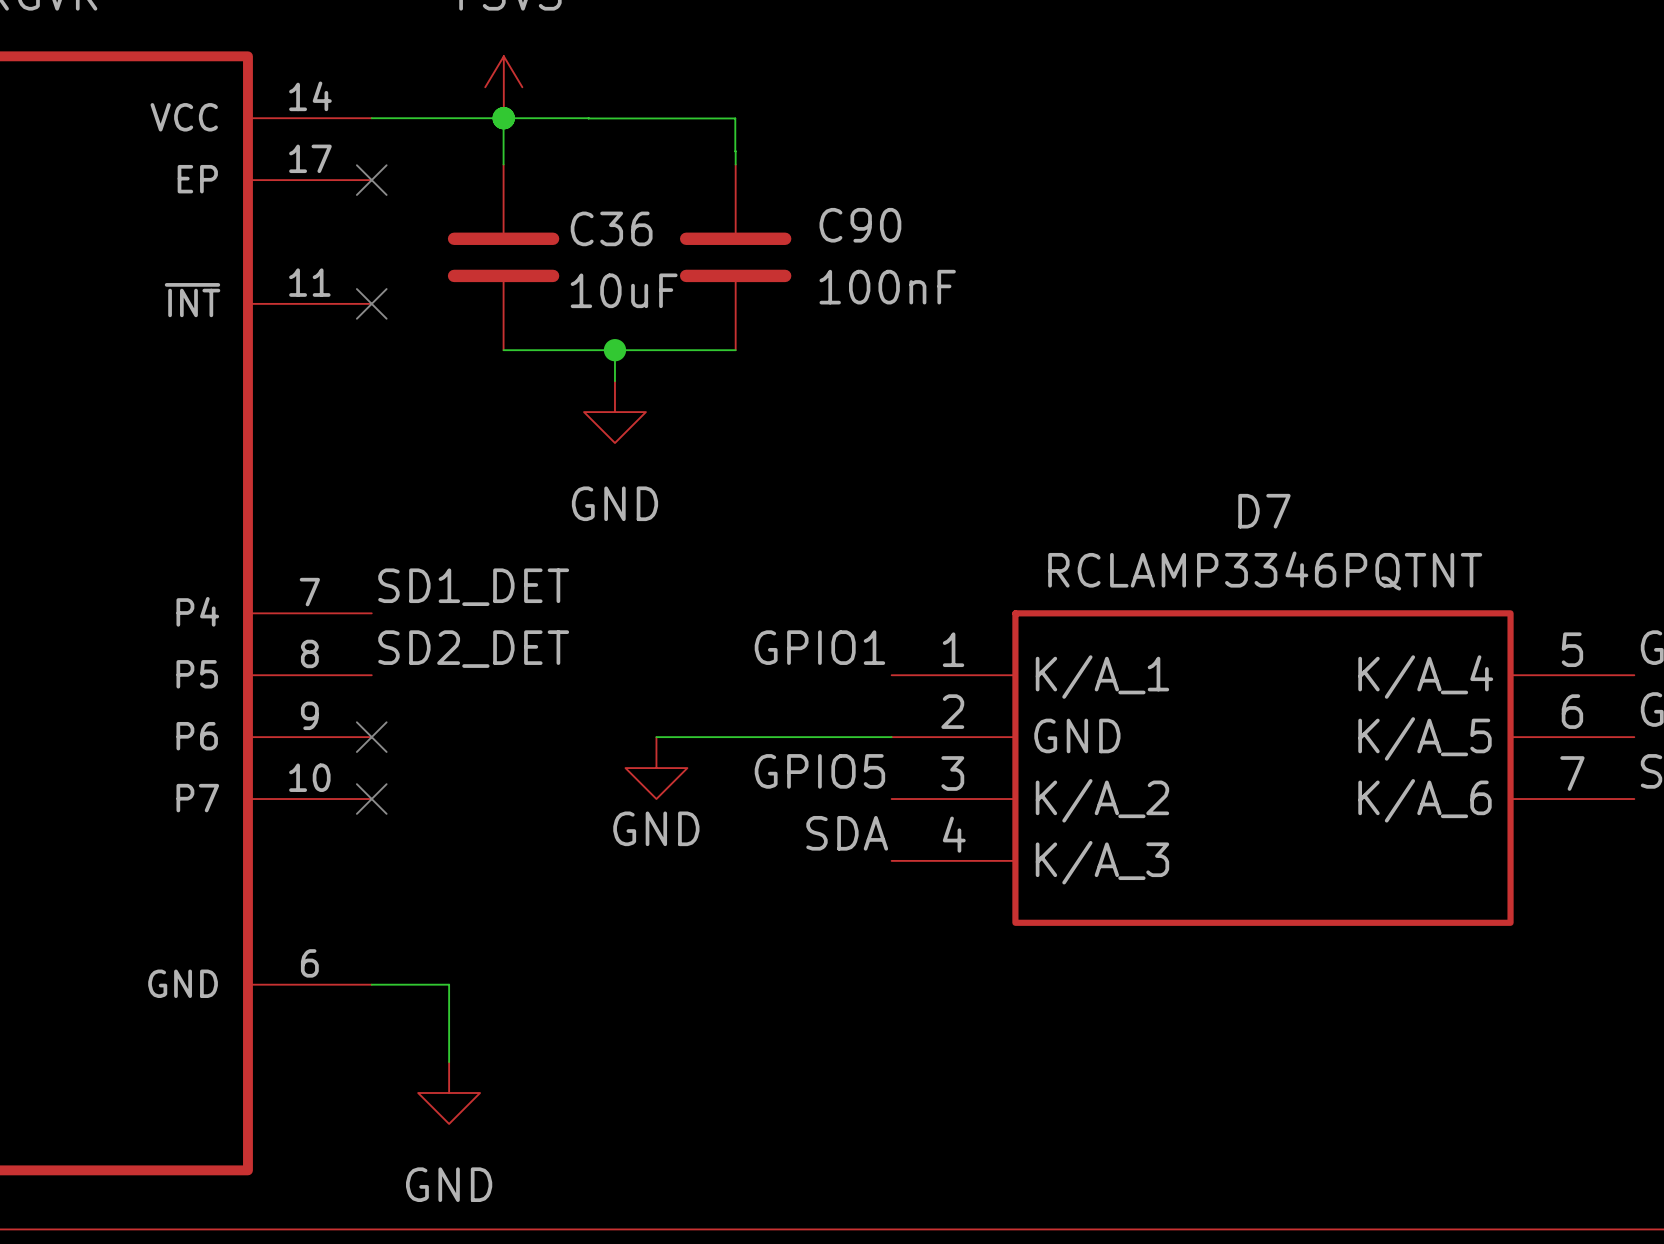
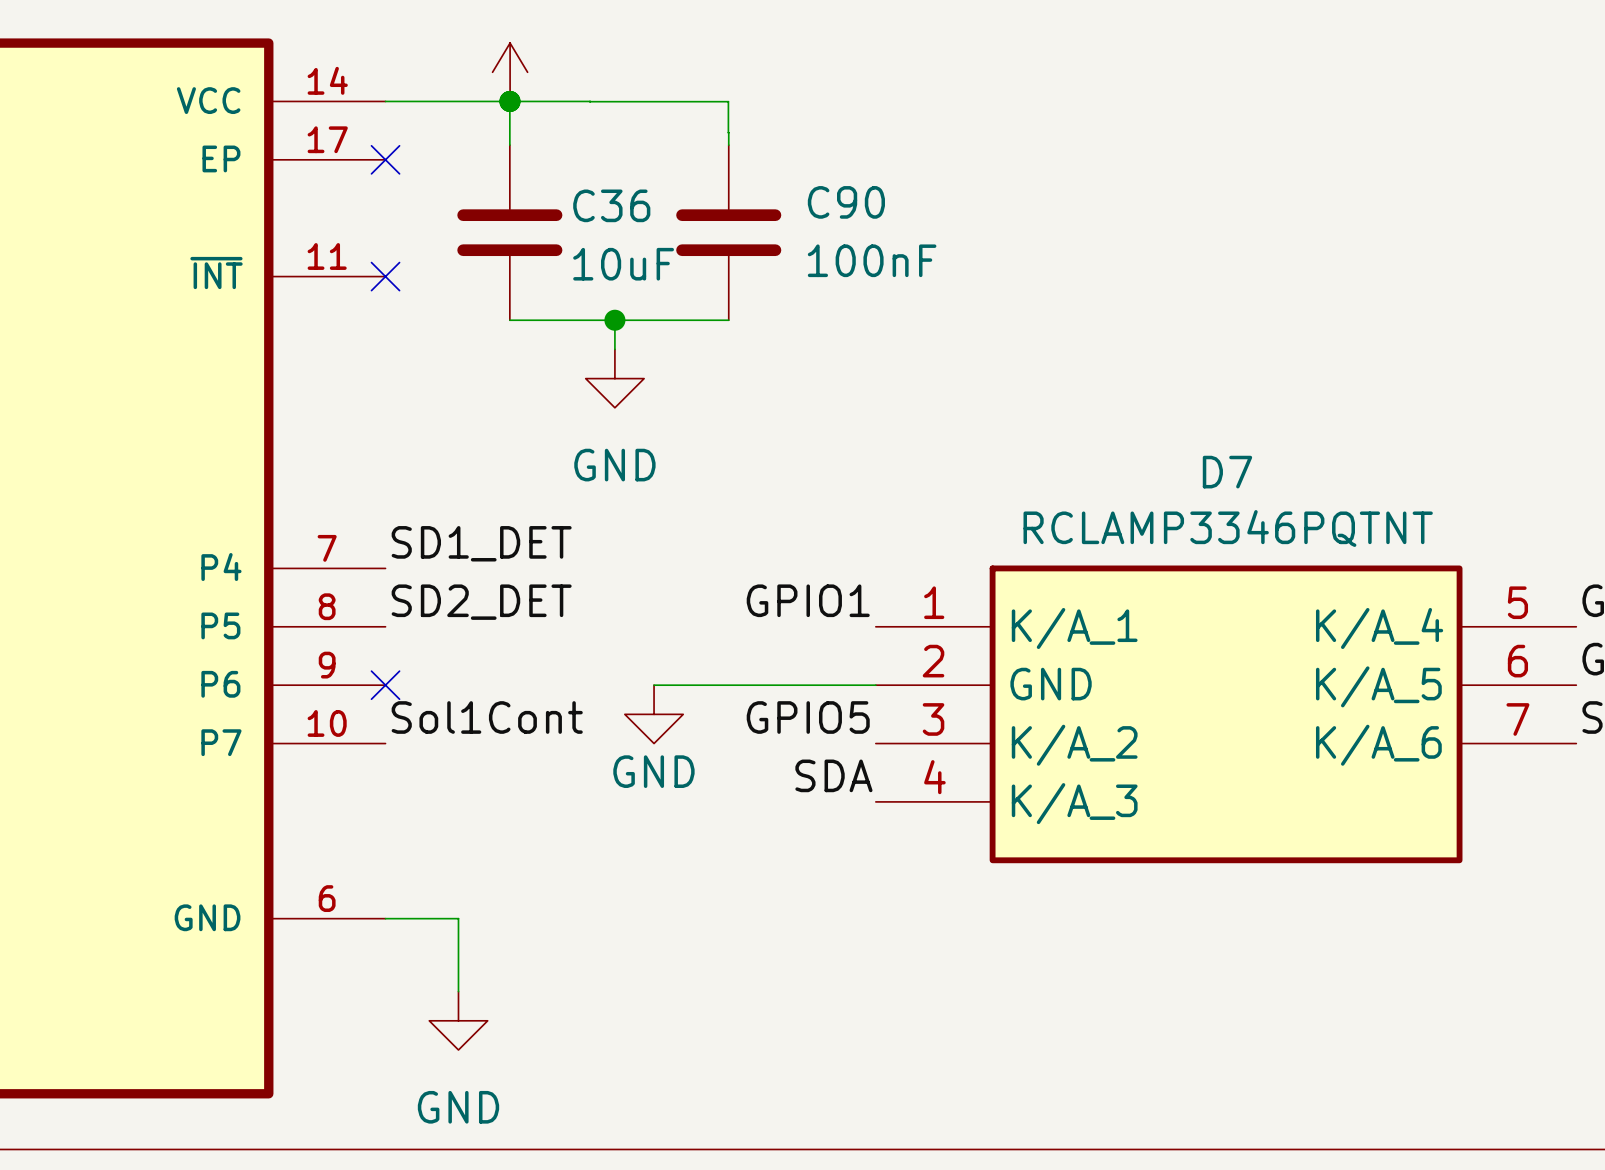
label: none -> Sol1Cont (487, 717)
no-connect mark: (371, 799) -> none

